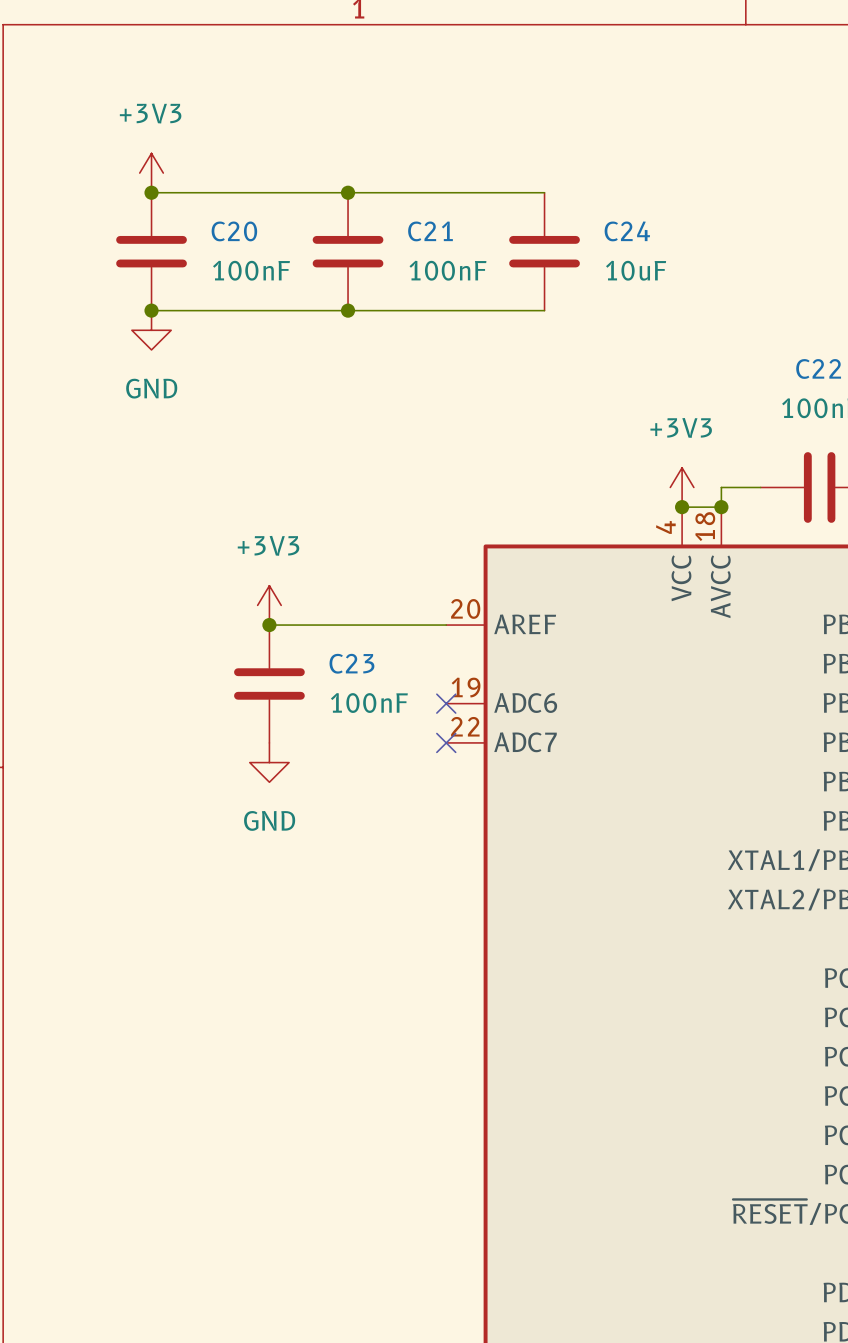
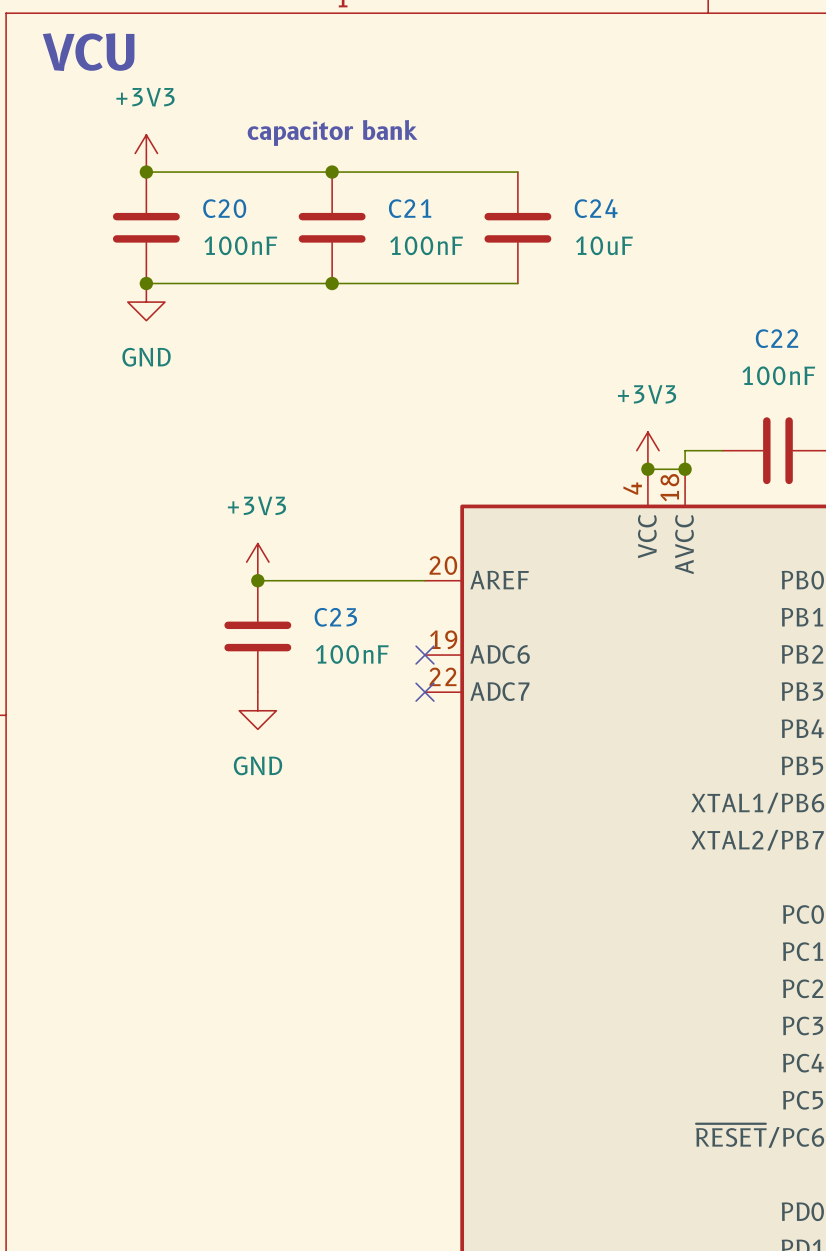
text: none -> VCU (88, 52)
text: none -> capacitor bank (332, 132)

